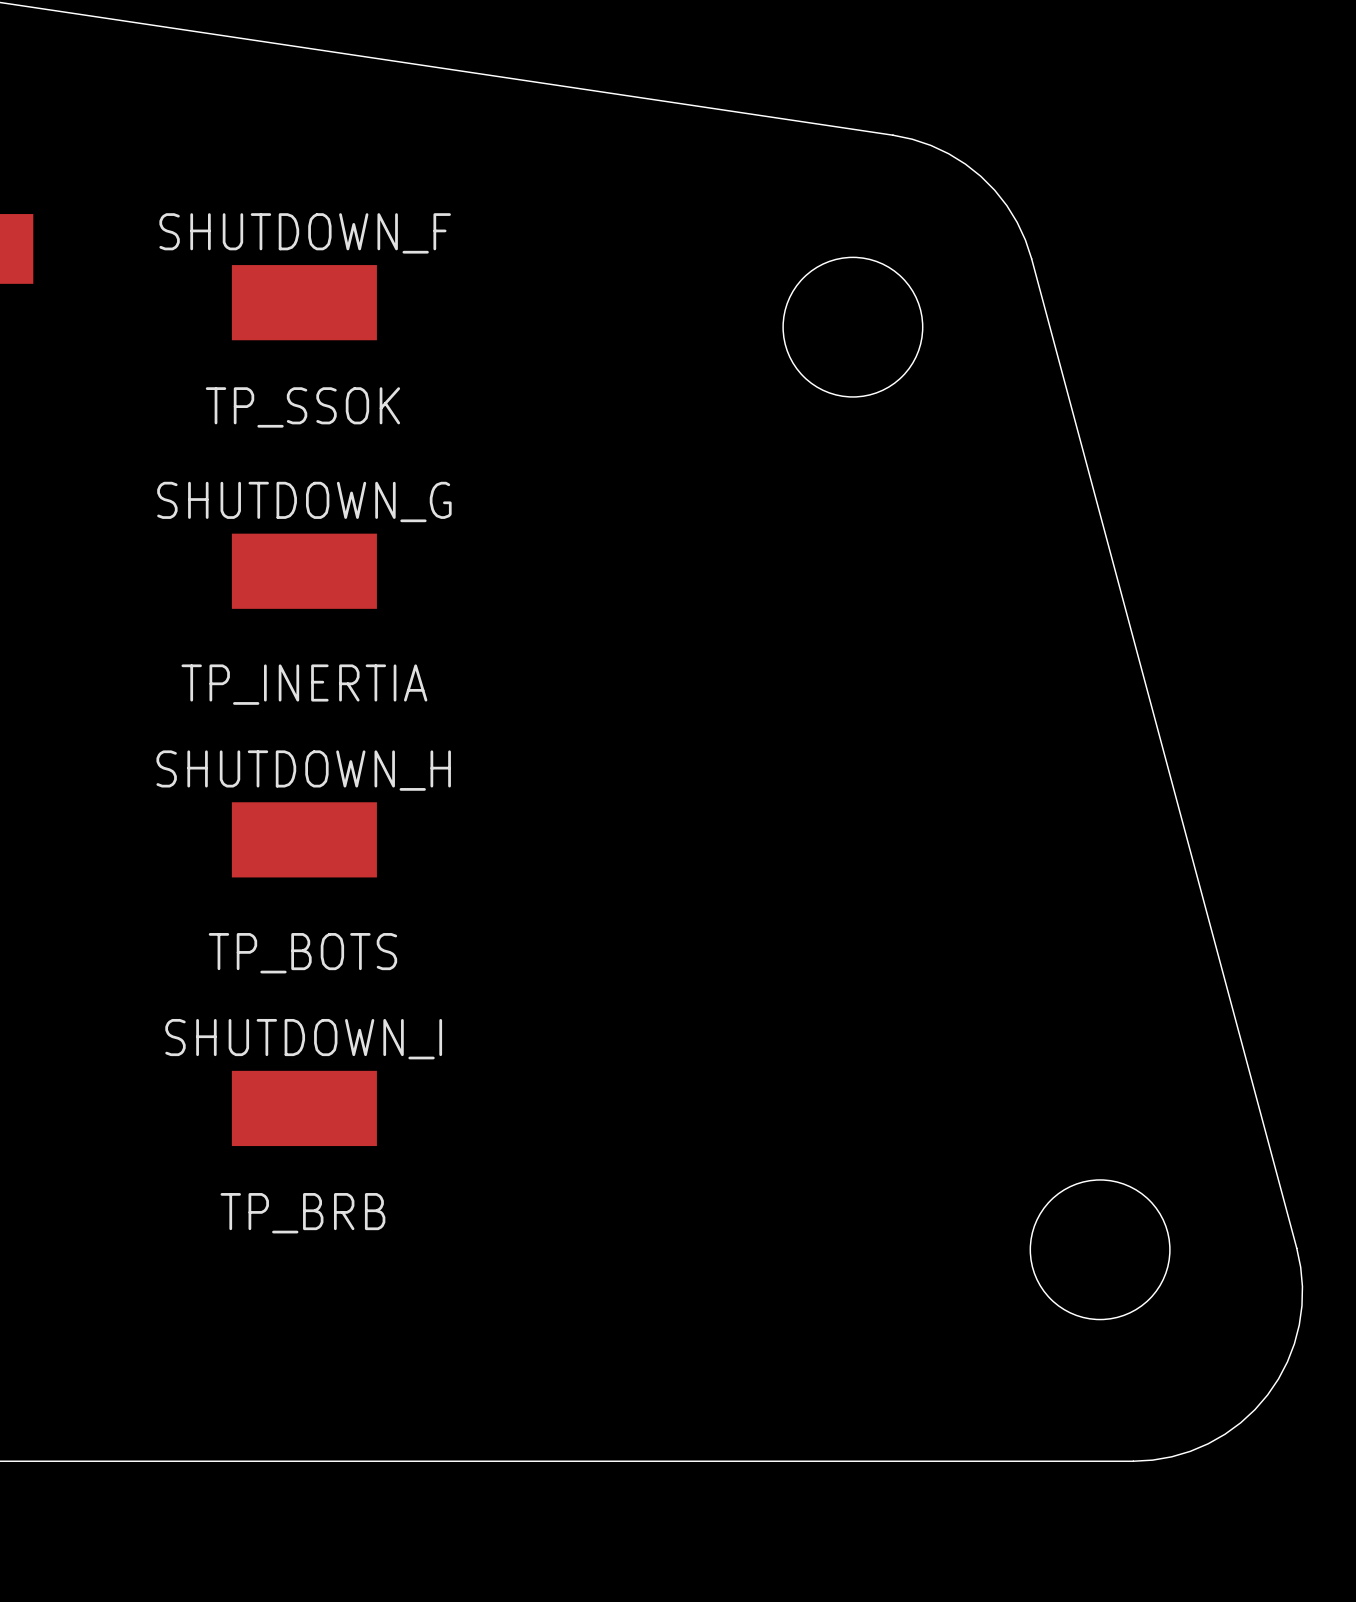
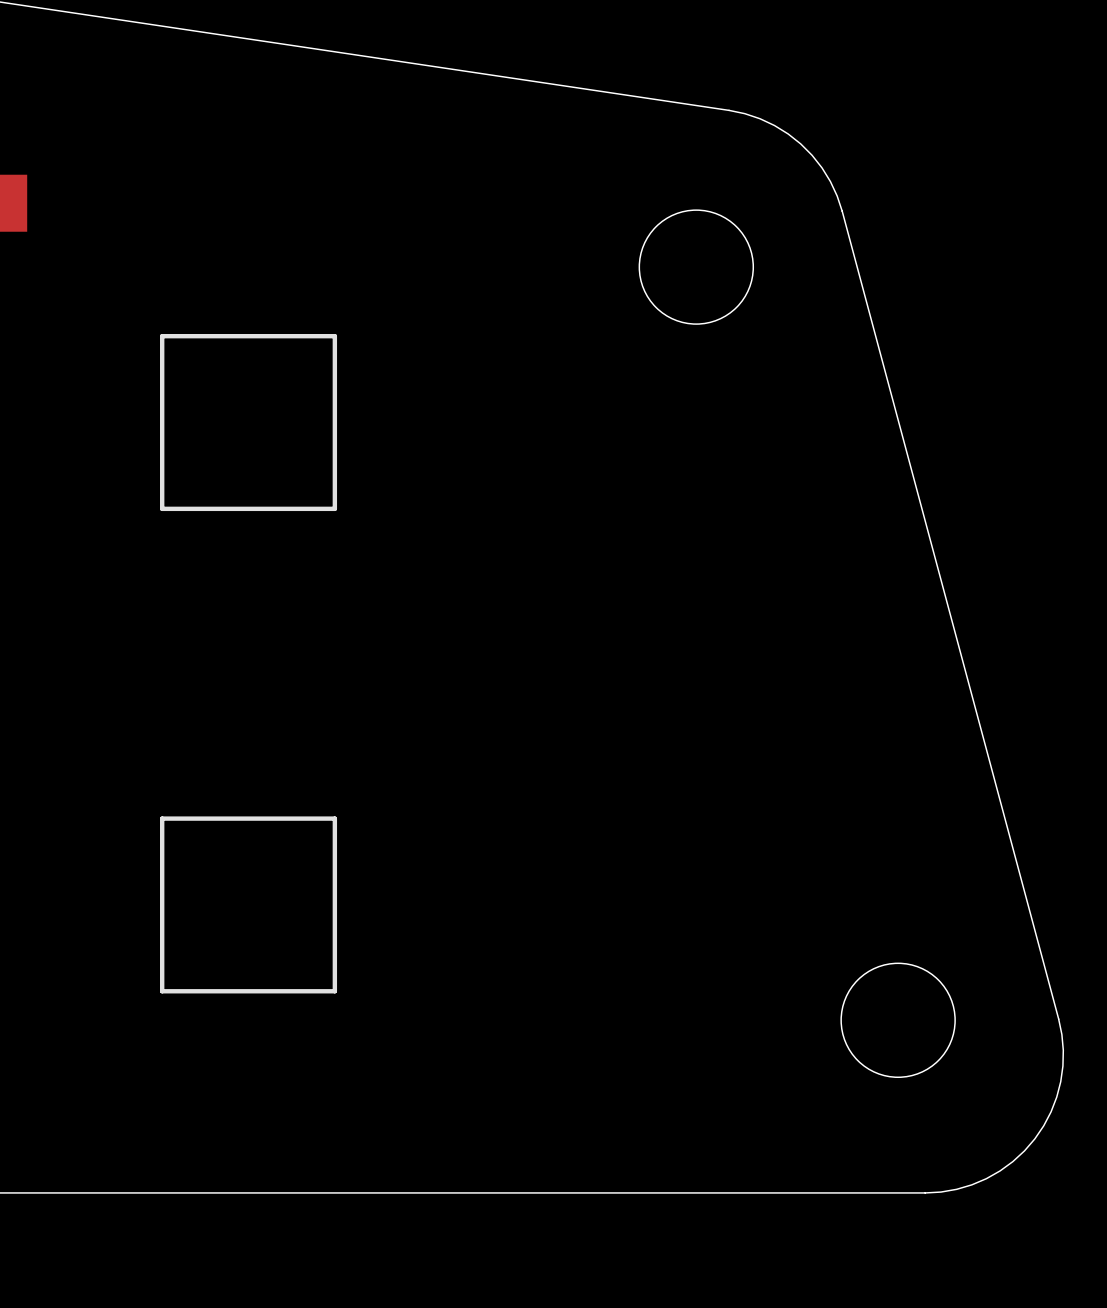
TP_SSOK: (304, 302) -> none
part: none -> (248, 422)
TP_INERTIA: (304, 571) -> none
TP_BOTS: (304, 839) -> none
text: SHUTDOWN_I (303, 1039) -> none
TP_BRB: (304, 1108) -> none
part: none -> (248, 904)

